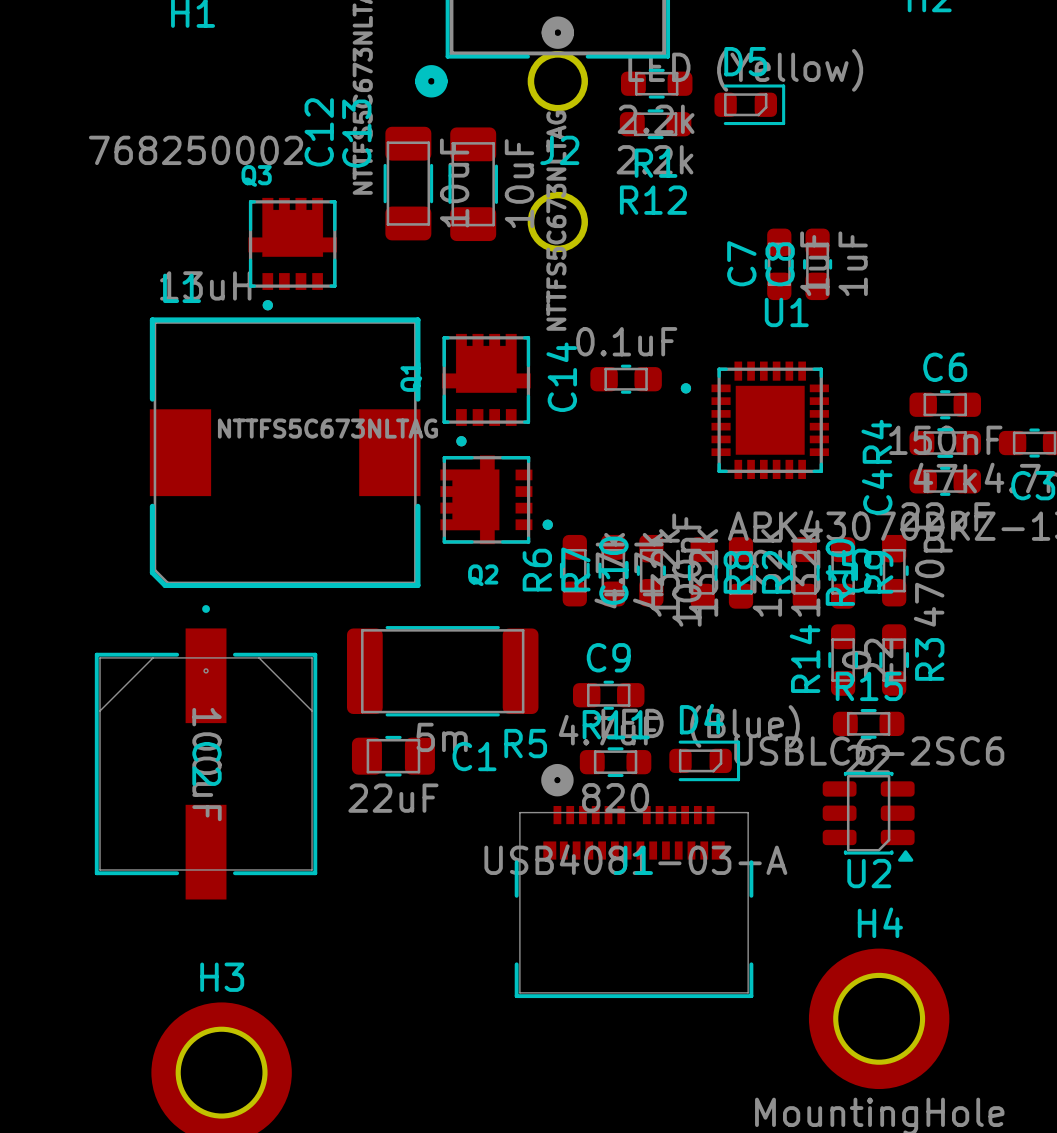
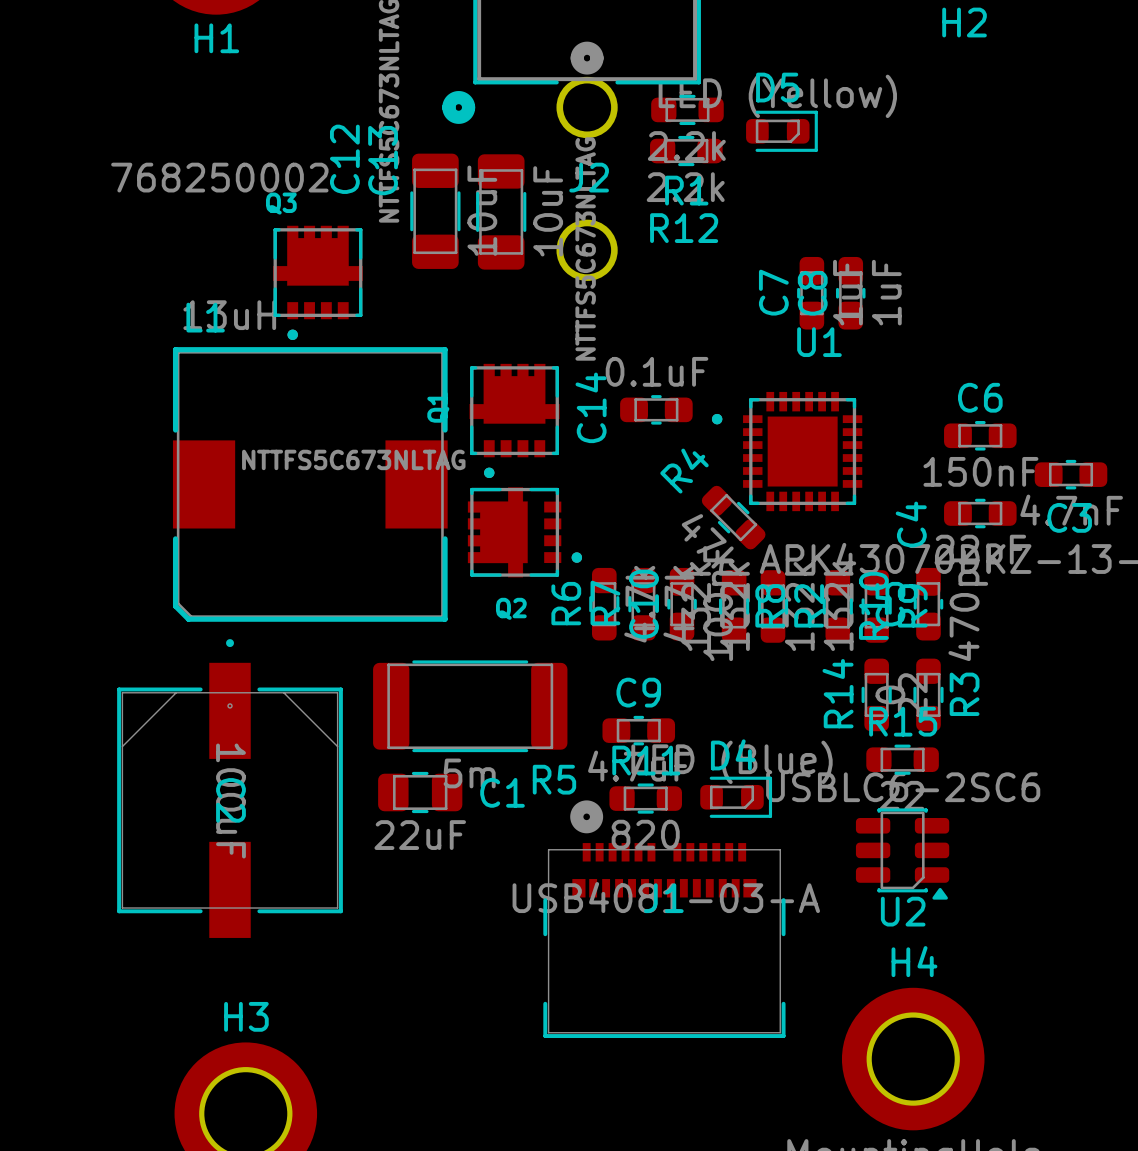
R4 rotation: 0° (945, 443) -> 45° clockwise (733, 517)
R4 position: (945, 443) -> (733, 517)

